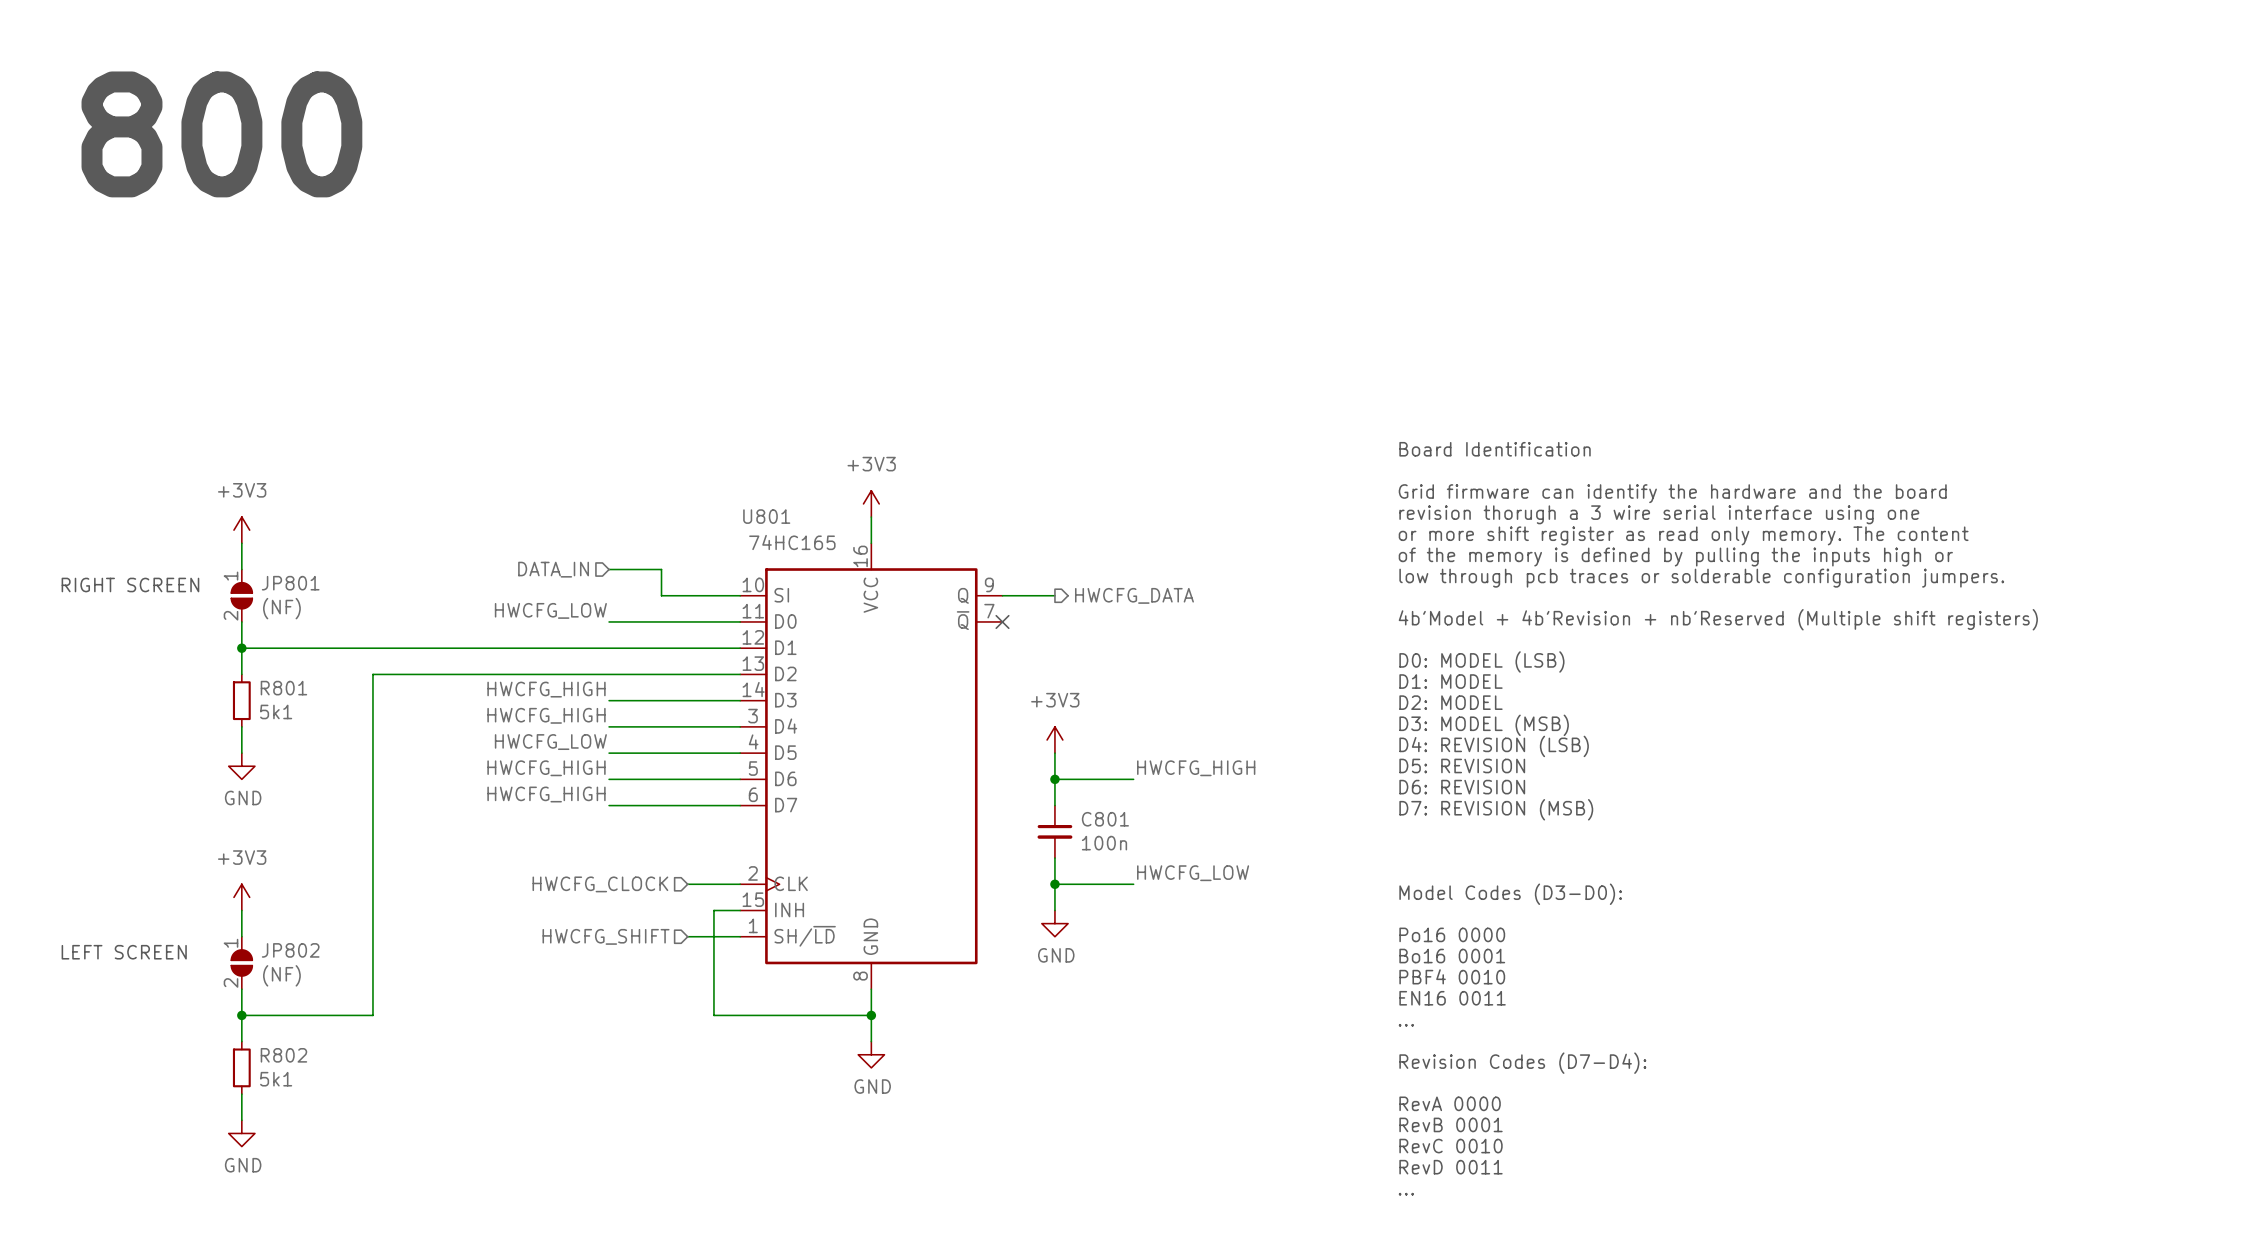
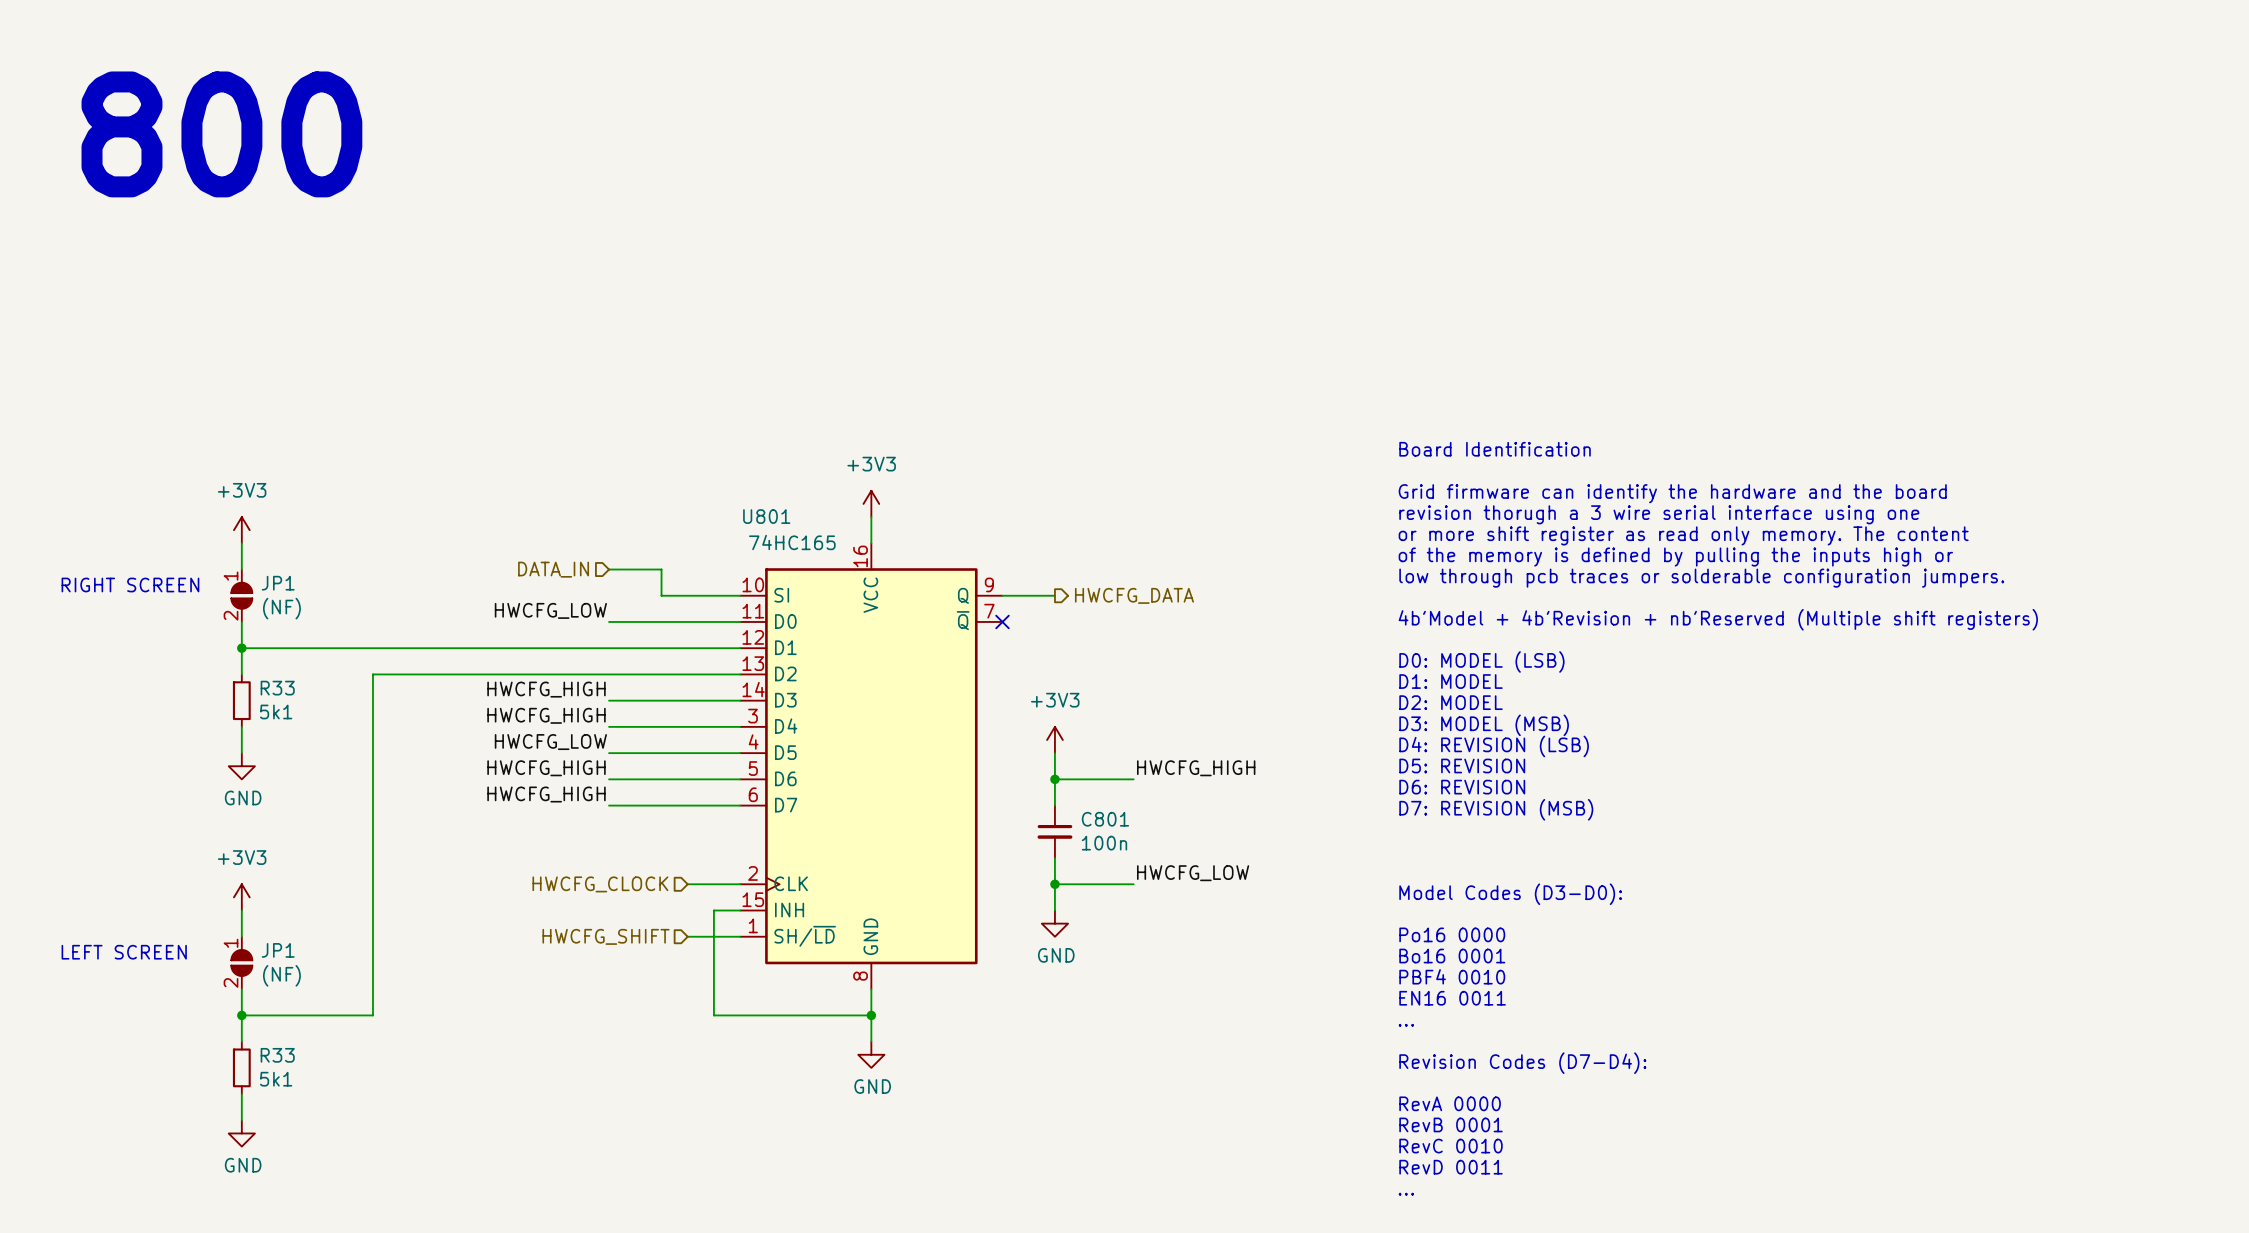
JP801 name: JP801 (290, 583) -> JP1 (278, 583)
R801 name: R801 (283, 688) -> R33 (277, 688)
JP802 name: JP802 (290, 950) -> JP1 (278, 950)
R802 name: R802 (283, 1055) -> R33 (277, 1055)

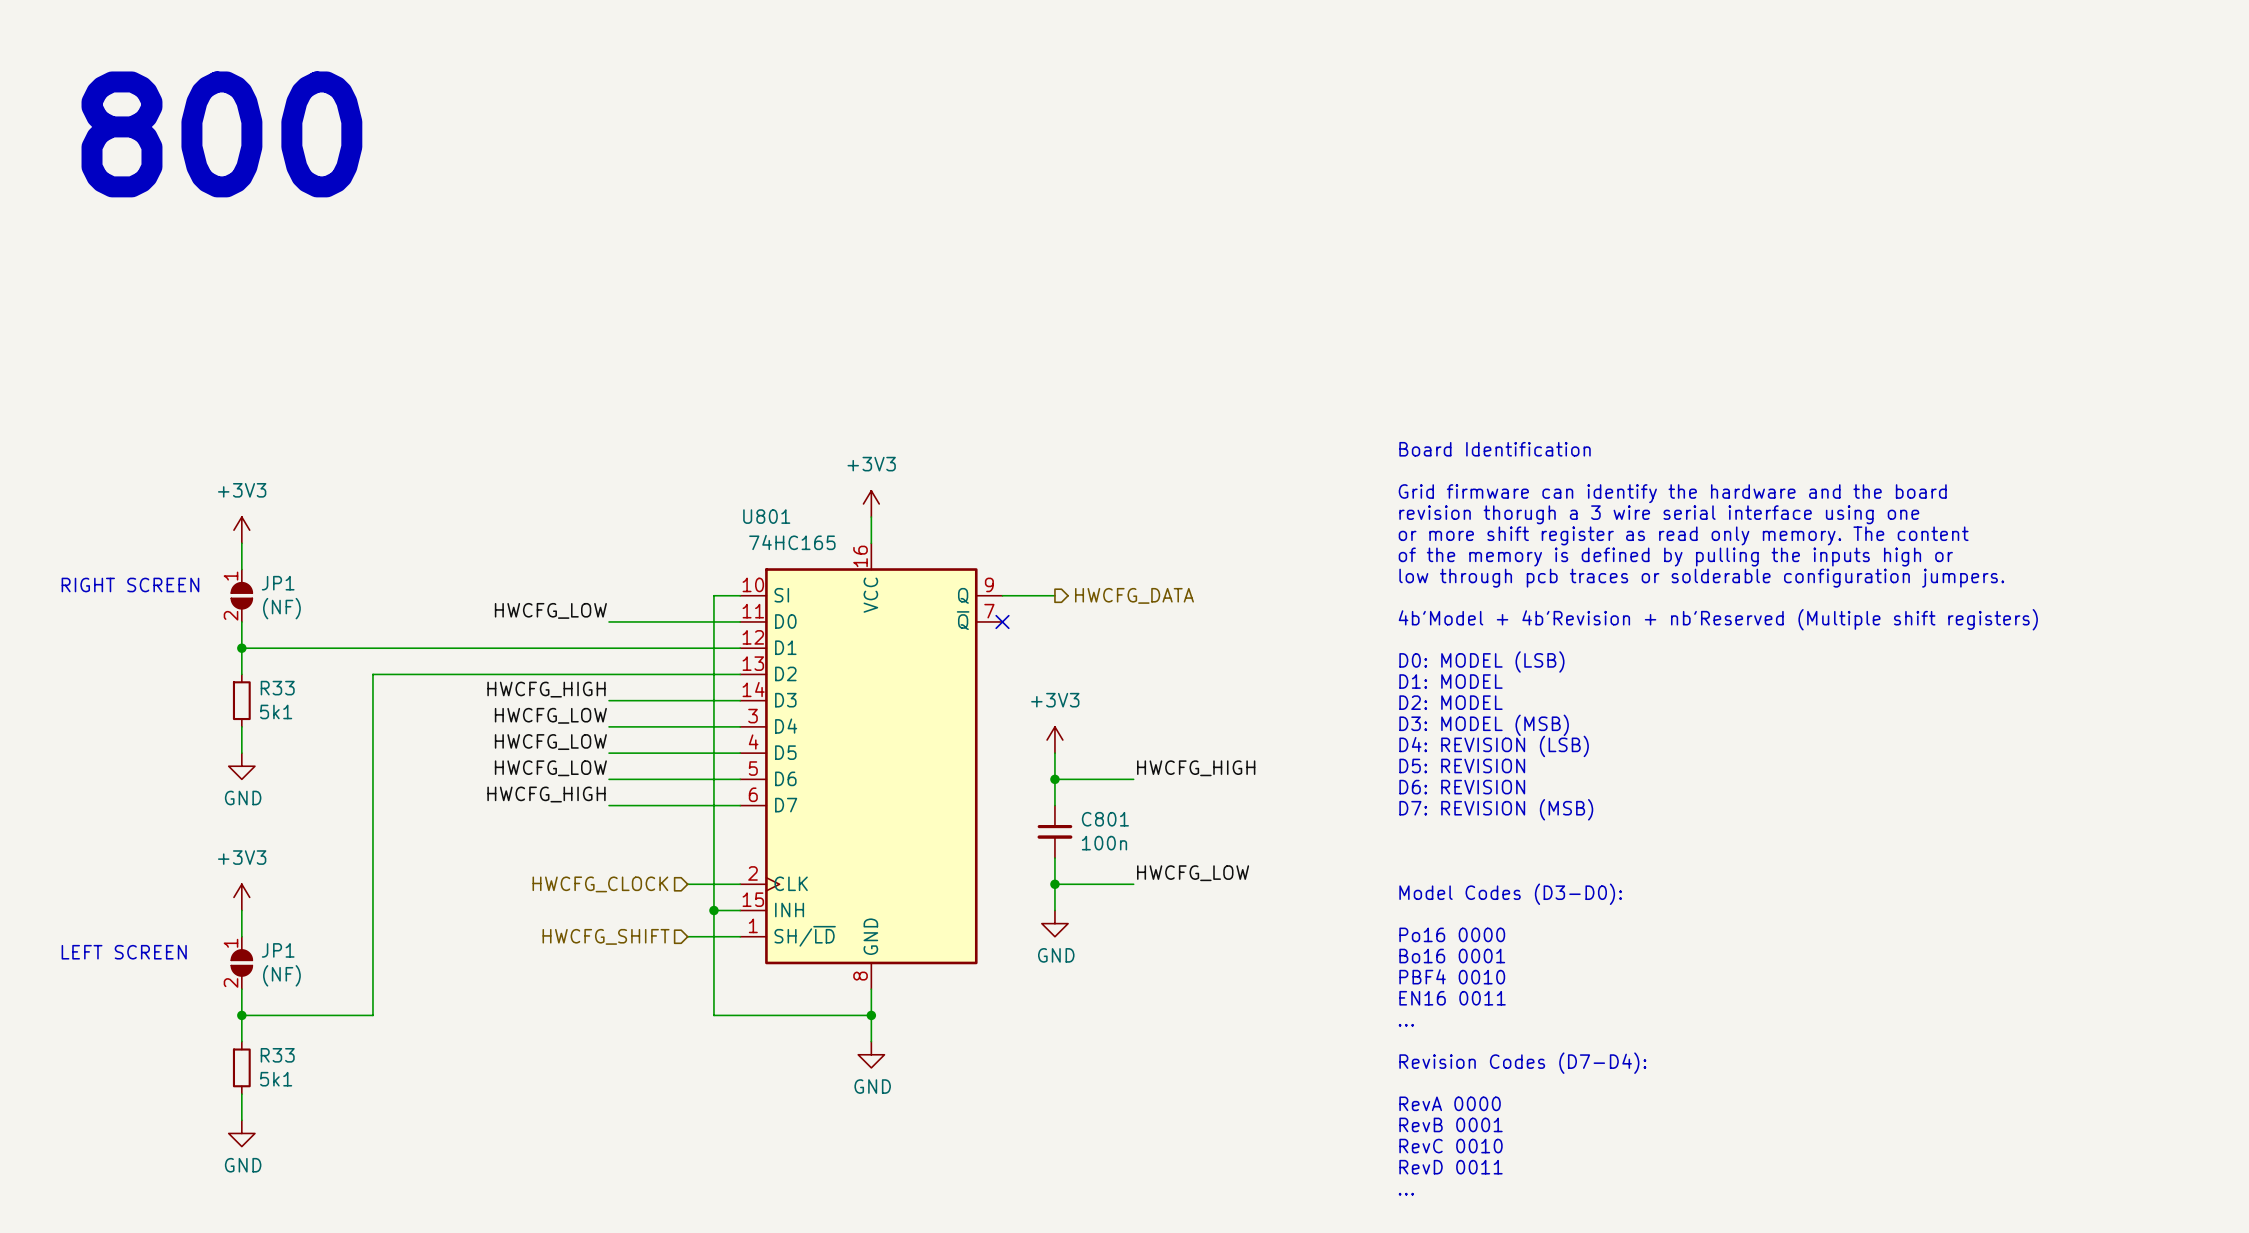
hierarchical label: DATA_IN (553, 569) -> none
wire: (609, 569) (661, 569) (661, 595) (713, 595) -> (713, 910) (713, 595)
label: HWCFG_HIGH (546, 715) -> HWCFG_LOW (550, 715)
label: HWCFG_HIGH (546, 768) -> HWCFG_LOW (550, 768)
junction: none -> (713, 910)

